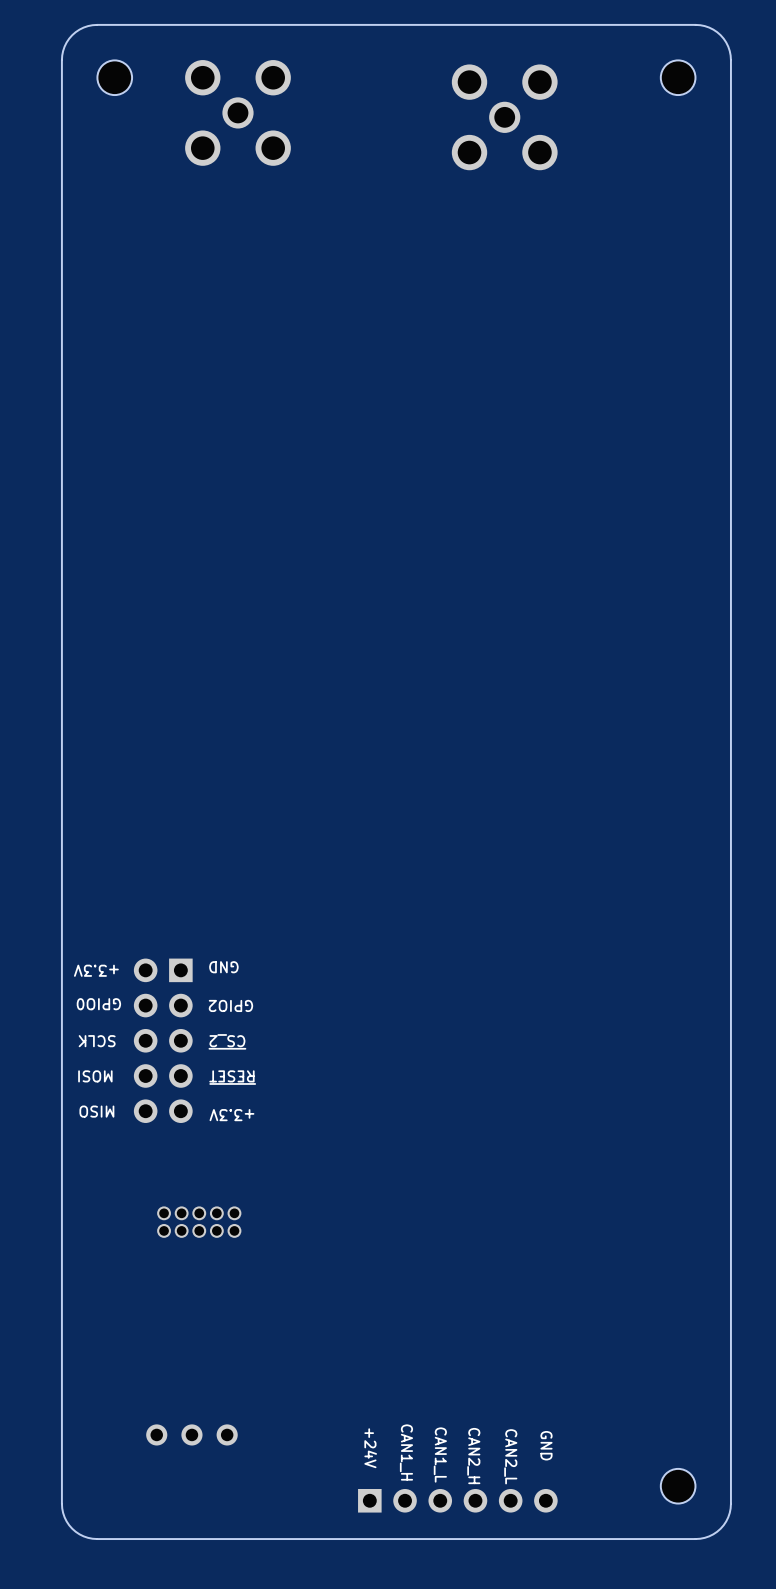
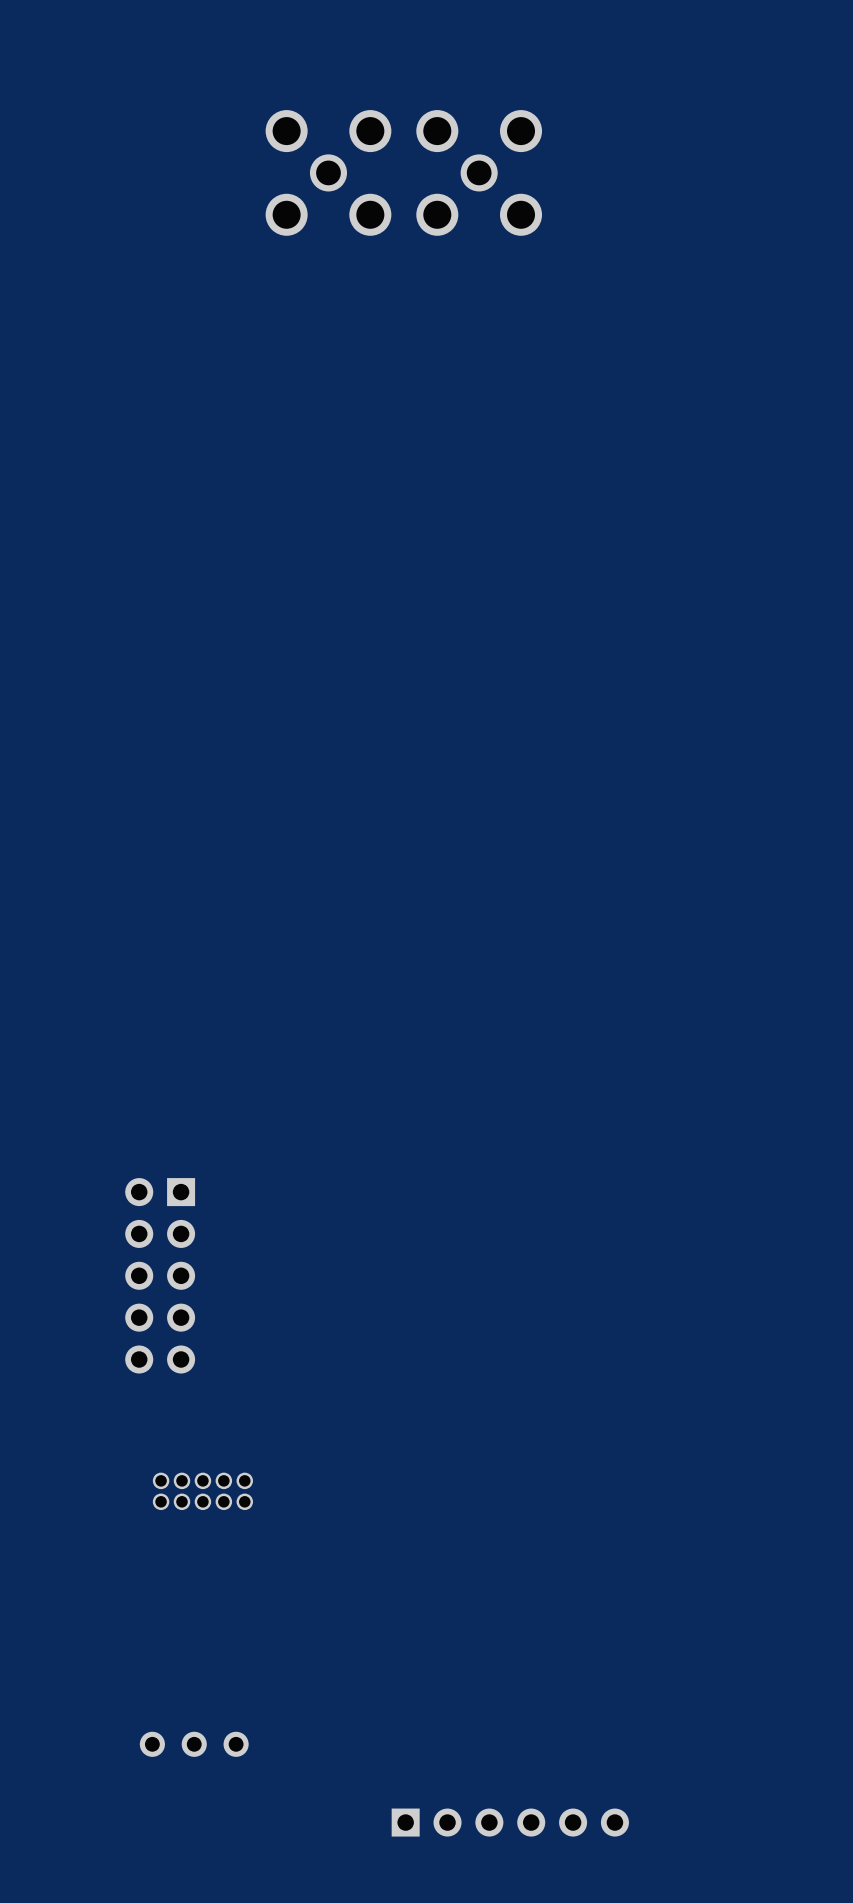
board edge: (695, 24) (97, 24) (83, 27) (75, 32) (64, 46) (61, 60) (61, 1503) (66, 1521) (75, 1531) (83, 1536) (97, 1539) (695, 1539) (713, 1534) (720, 1528) (728, 1517) (730, 1503) (730, 60) (728, 46) (720, 35) (709, 27) (695, 24) -> none
part: (114, 77) -> none
part: (678, 77) -> none
part position: (237, 112) -> (328, 172)
part position: (504, 117) -> (479, 172)
text: GND (223, 967) -> none
text: +3.3V (96, 970) -> none
text: GPIO0 (98, 1004) -> none
text: GPIO2 (230, 1005) -> none
text: SCLK (97, 1041) -> none
text: ~{CS_2} (227, 1041) -> none
text: MOSI (95, 1076) -> none
text: ~{RESET} (232, 1077) -> none
text: MISO (96, 1111) -> none
text: +3.3V (231, 1115) -> none
text: GND (546, 1445) -> none
text: +24V (370, 1448) -> none
text: CAN1_H (406, 1452) -> none
text: CAN1_L (440, 1455) -> none
text: CAN2_H (473, 1456) -> none
text: CAN2_L (510, 1456) -> none
part: (678, 1486) -> none

